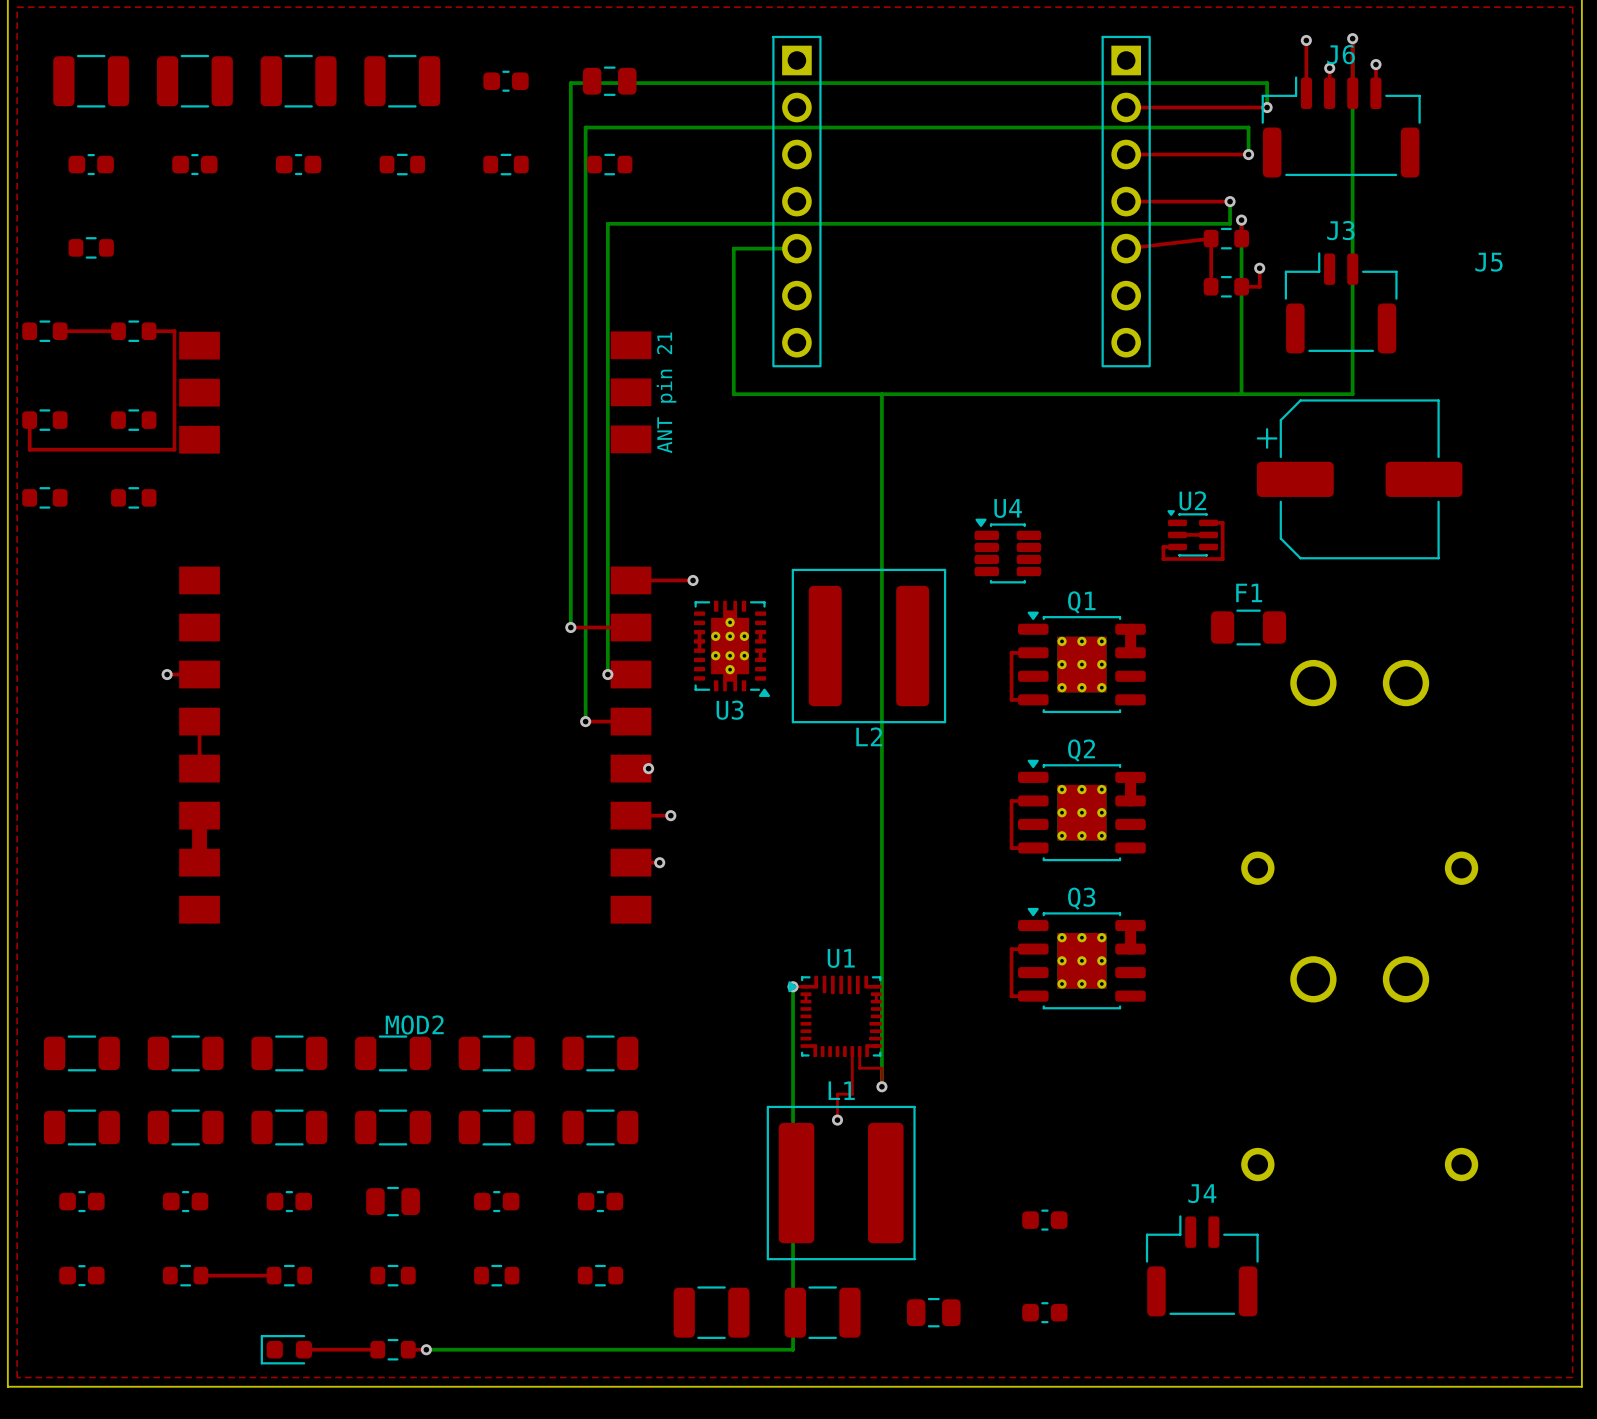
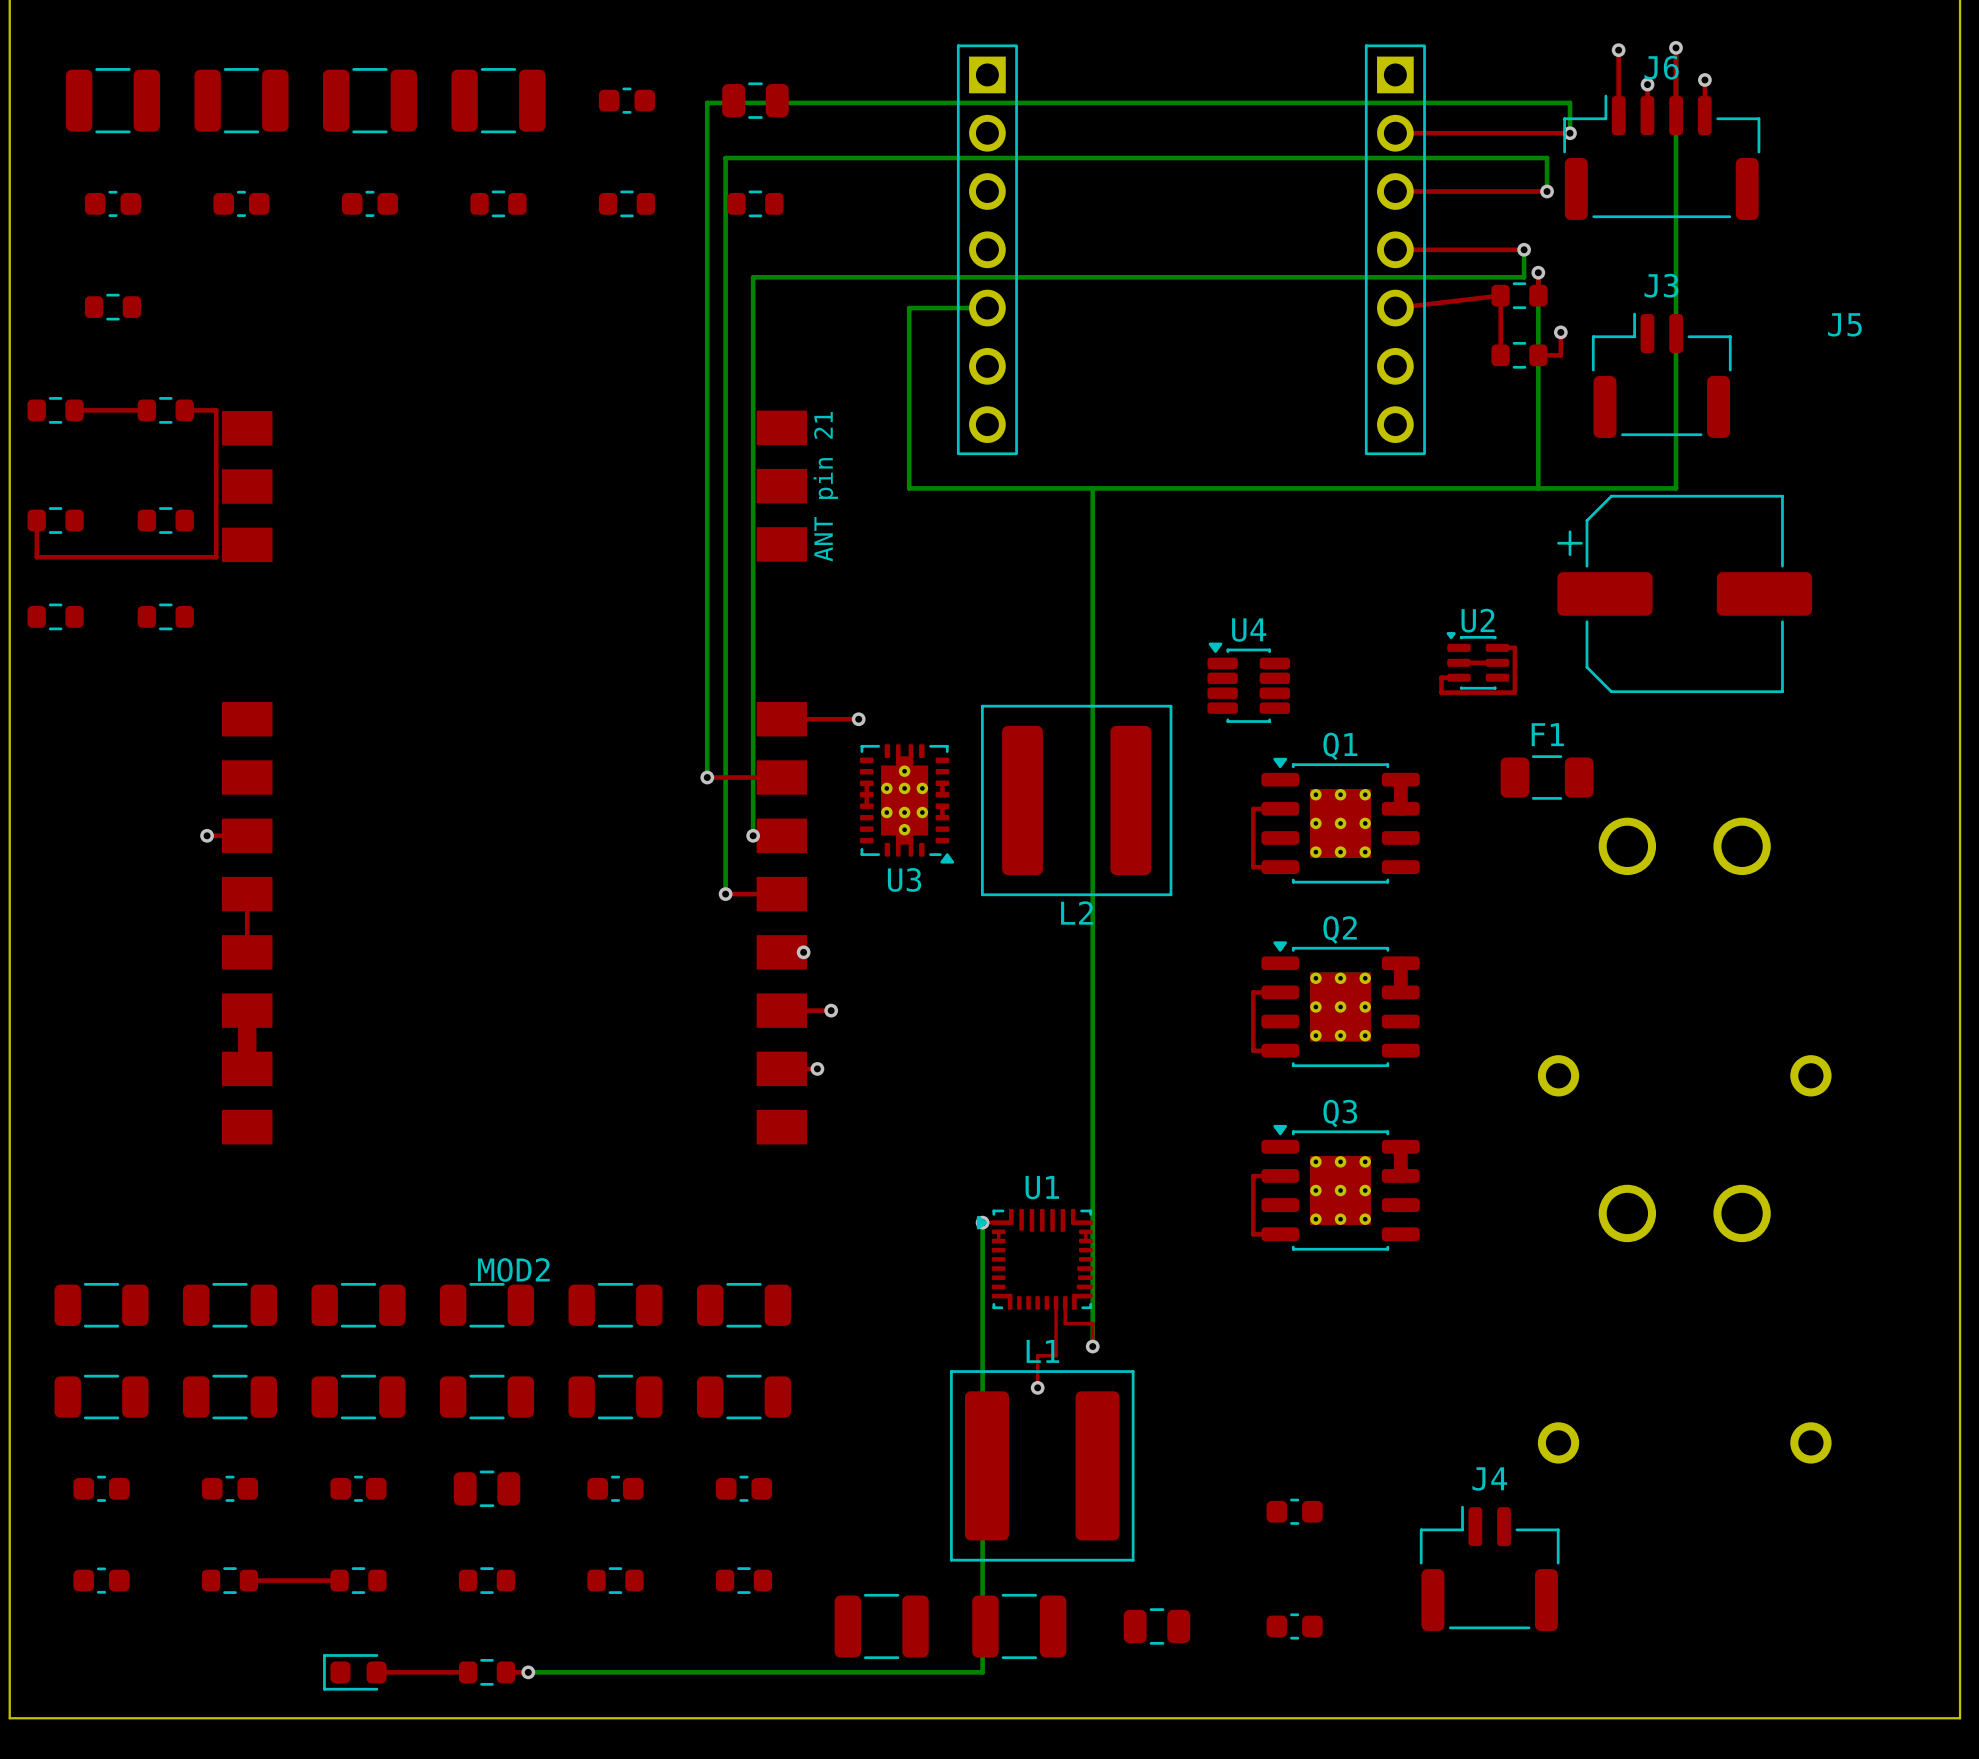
top zone outline: (17, 7) (1572, 7) (1572, 1377) (17, 1377) (17, 7) -> none

